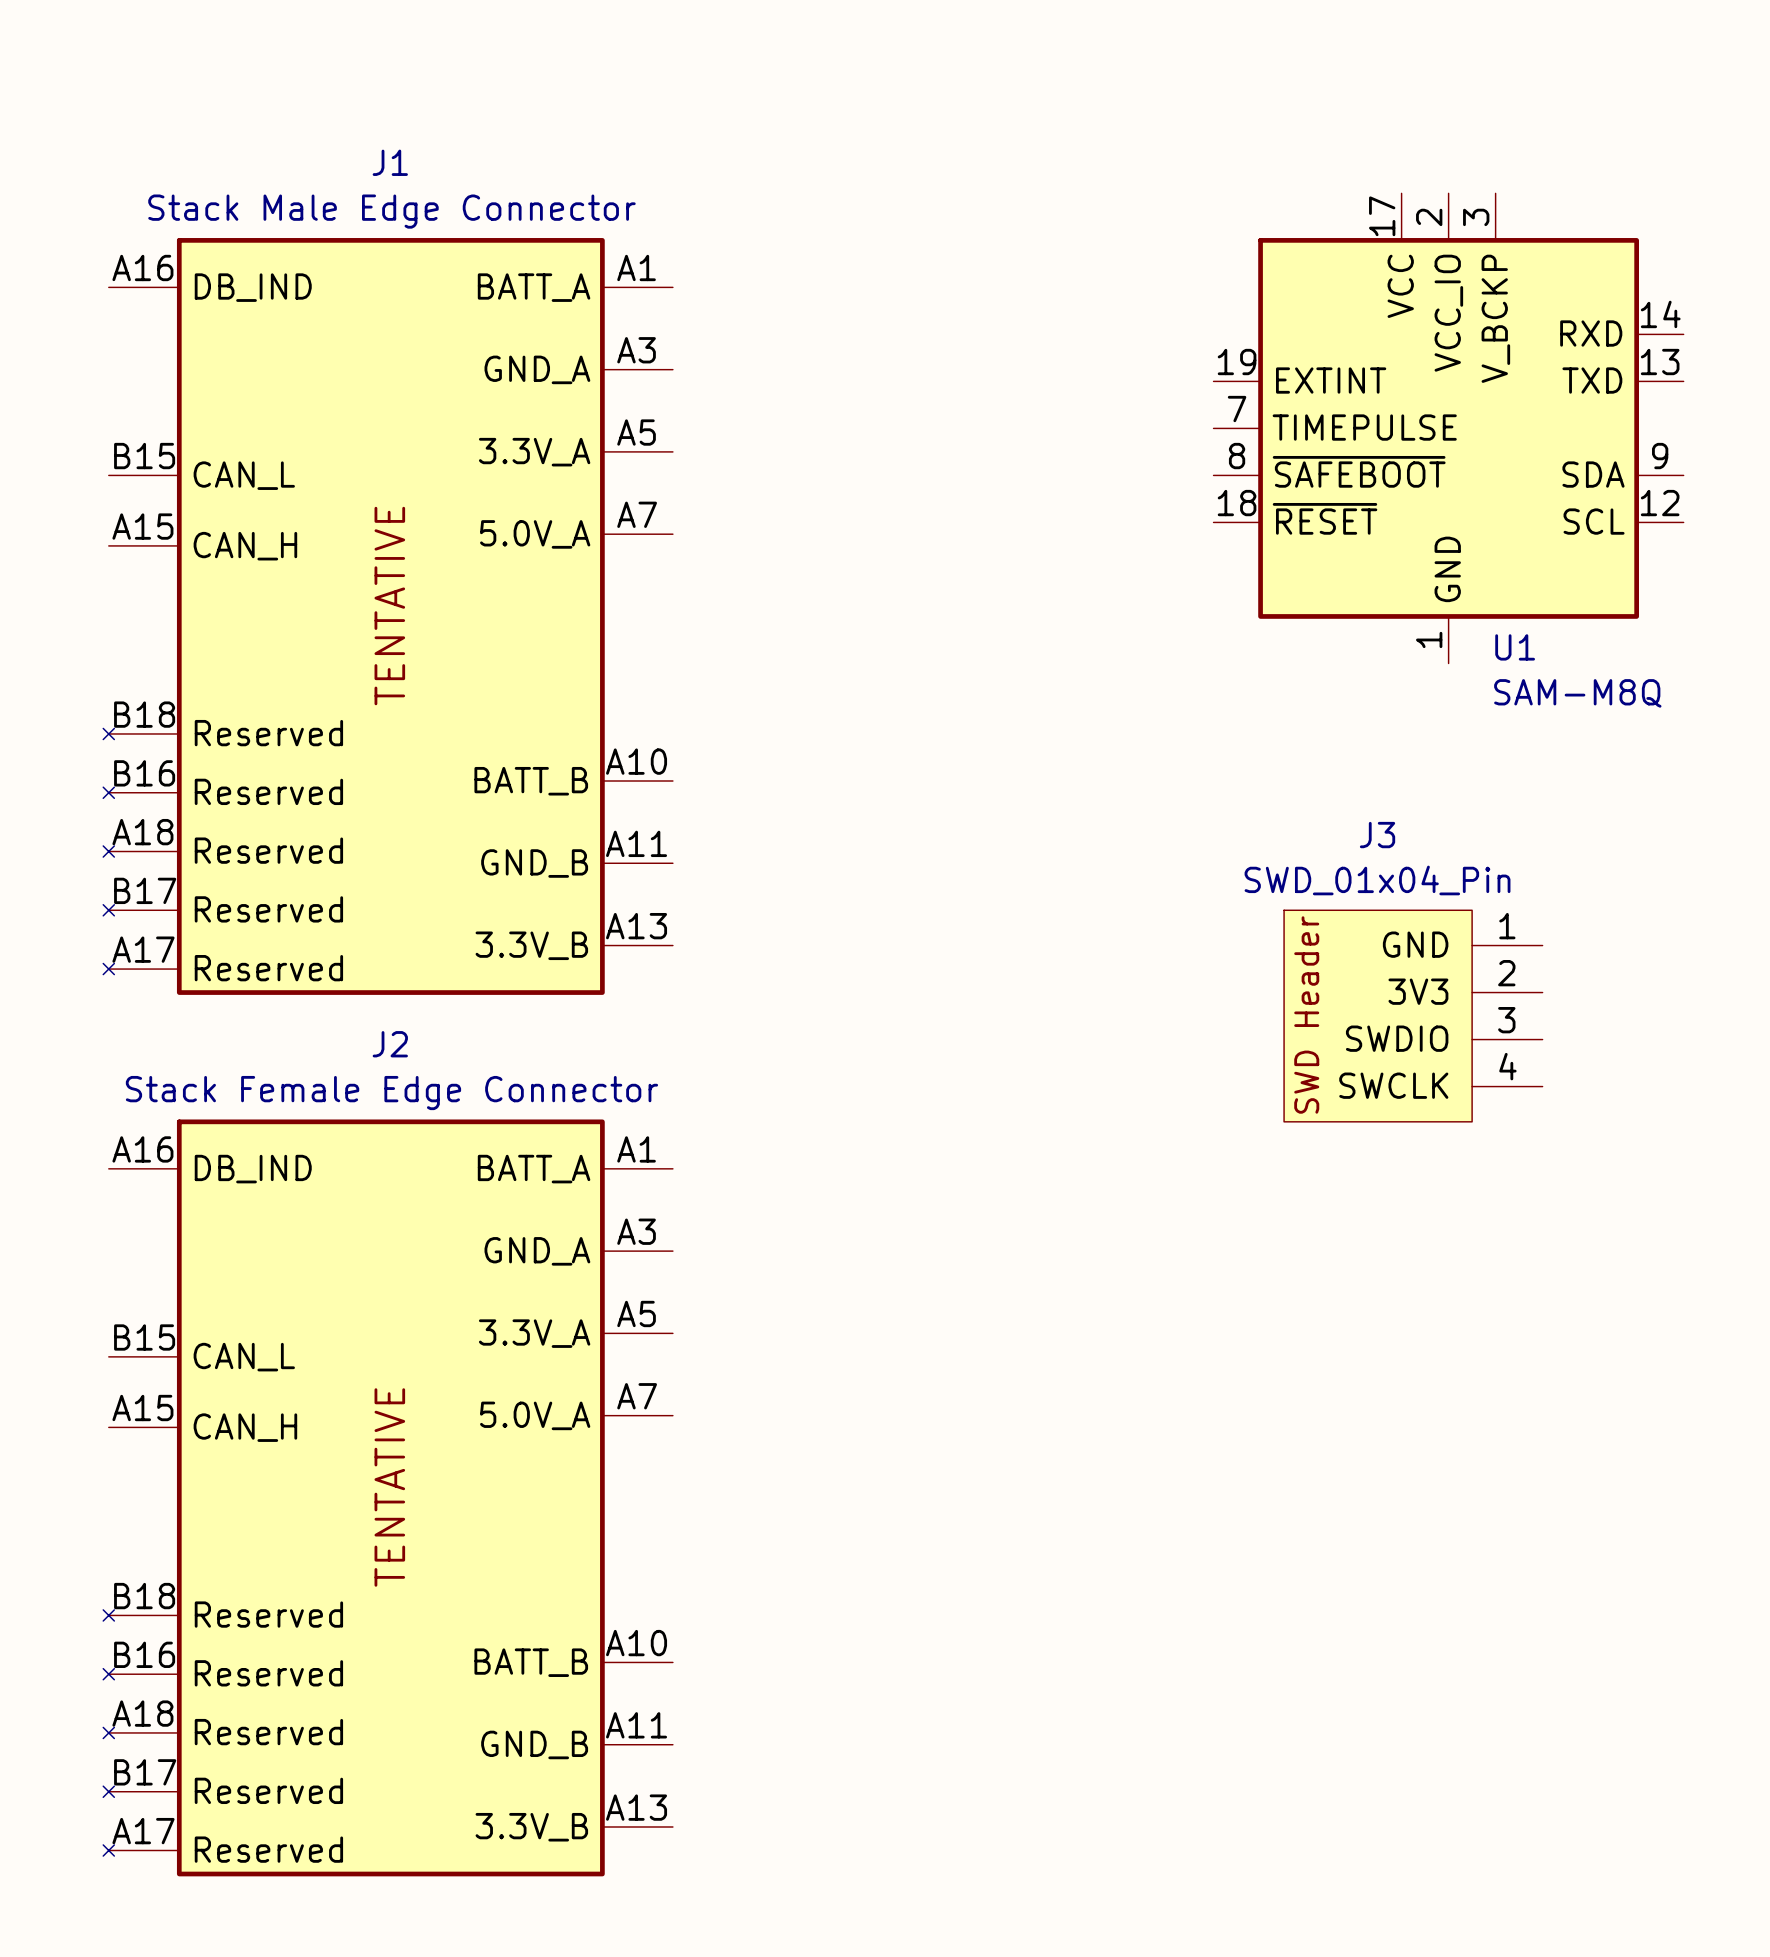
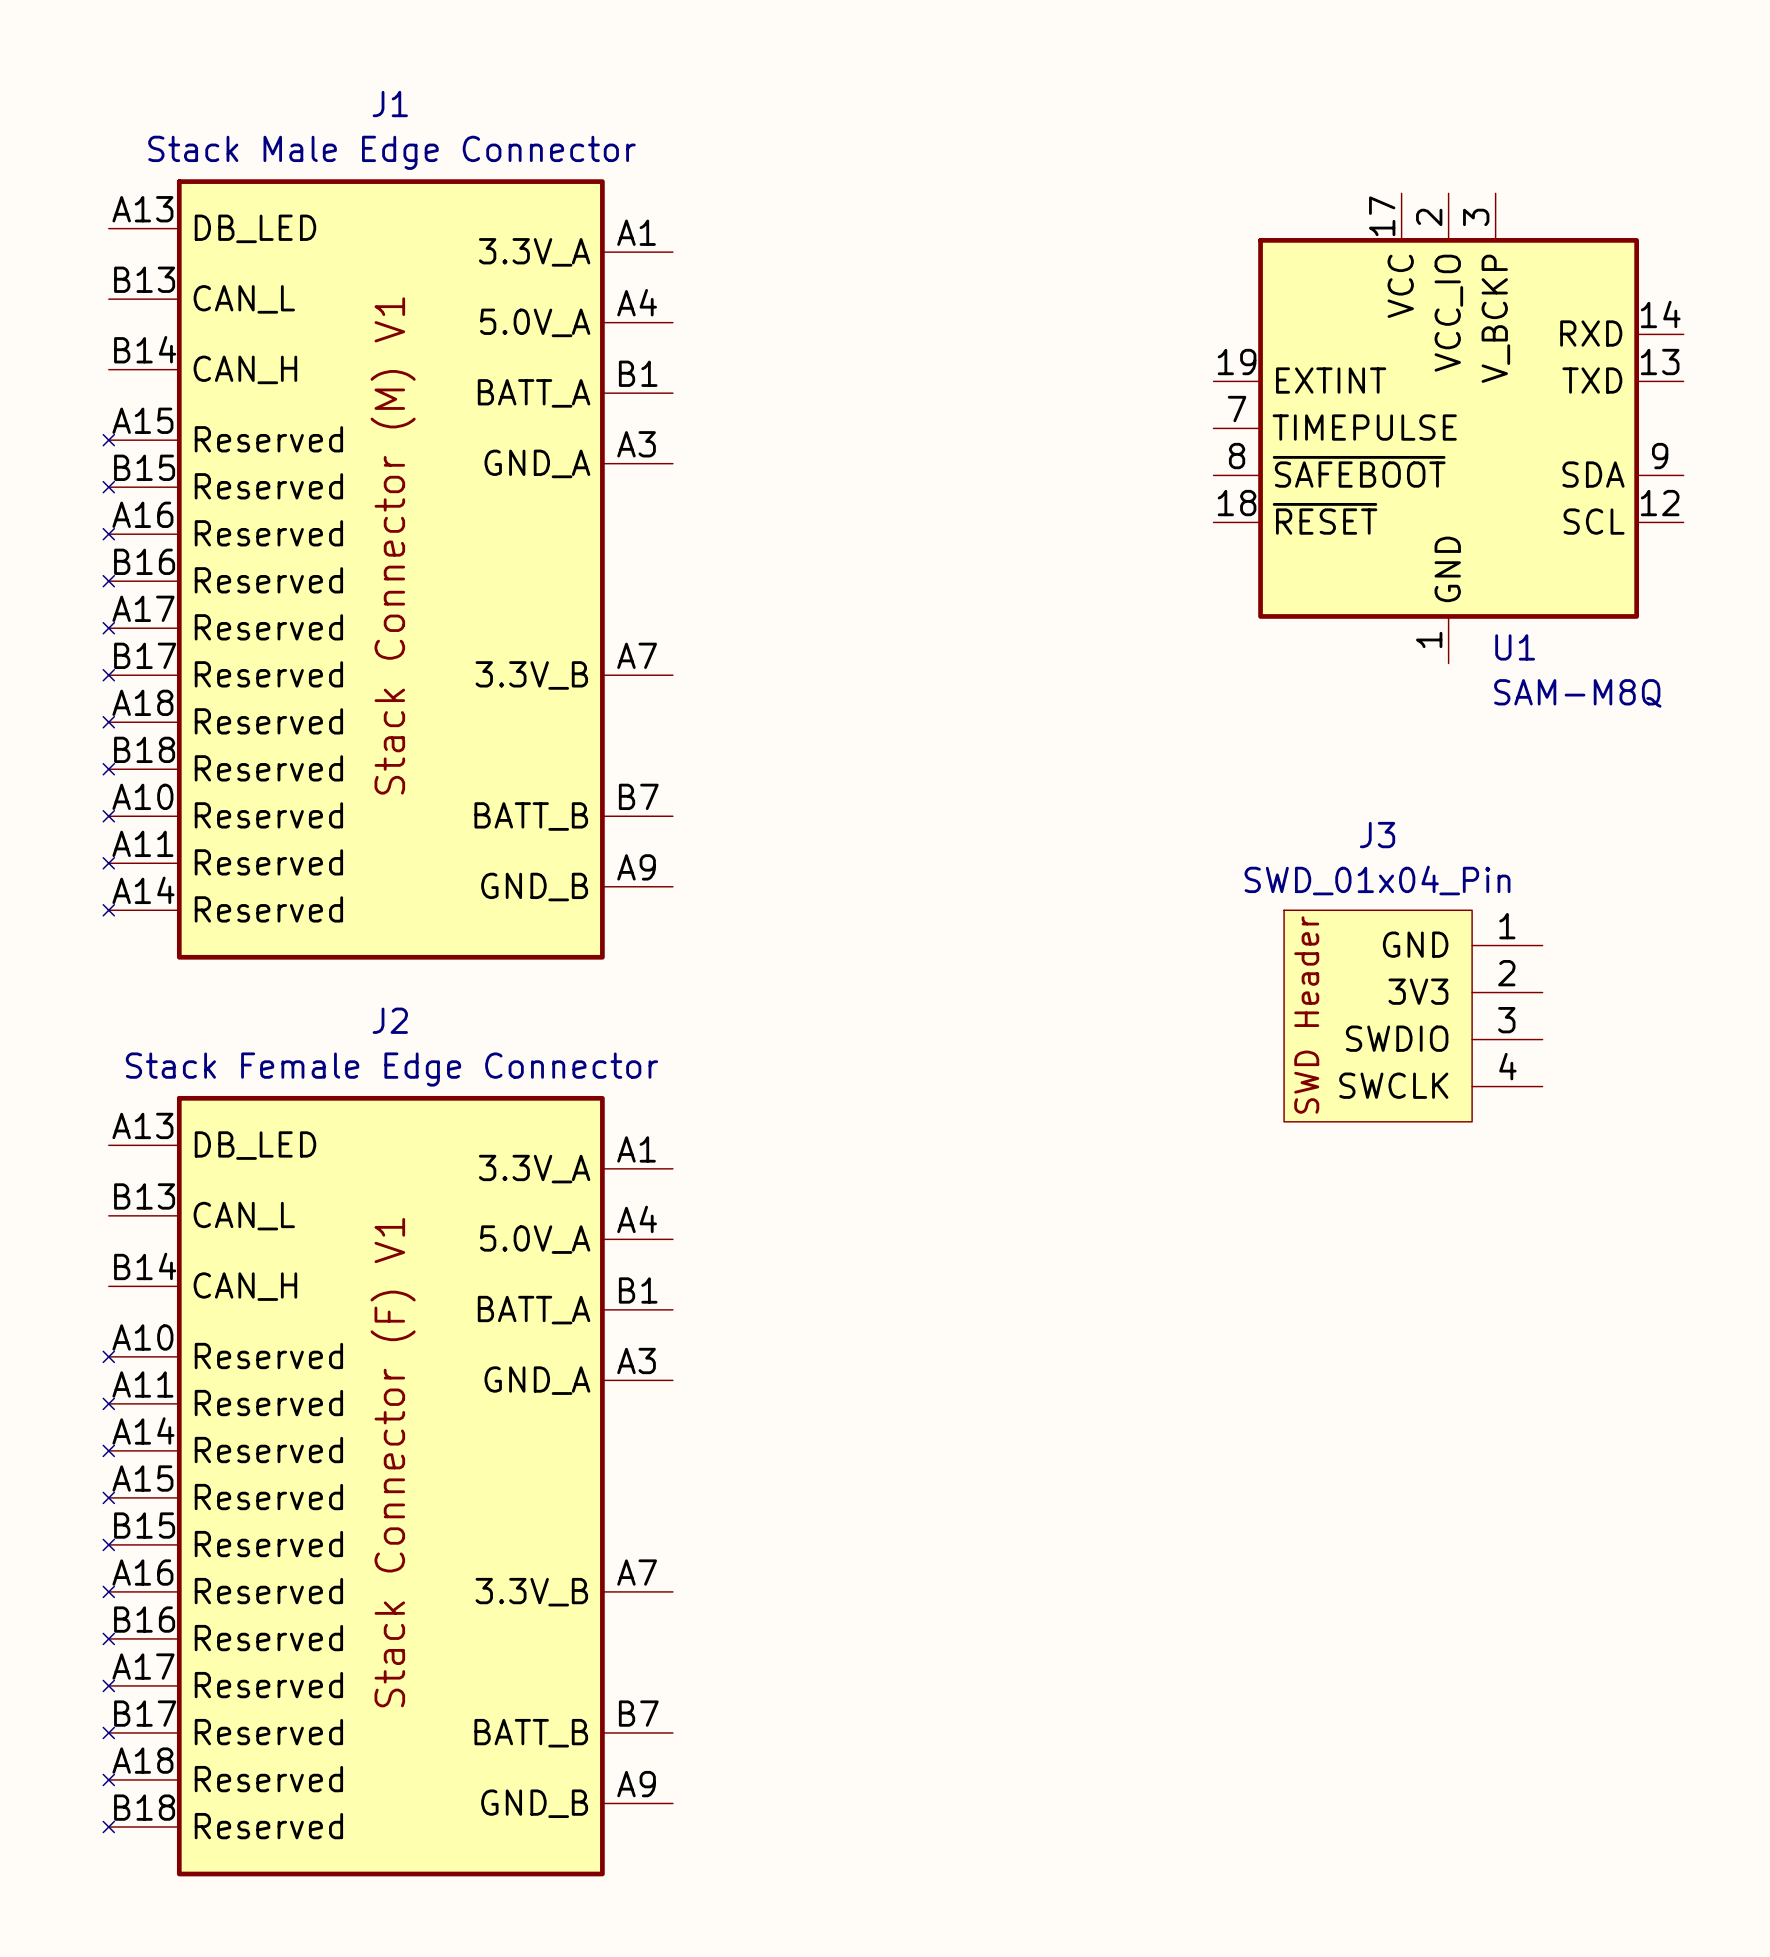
J1 symbol: [103, 238, 673, 995] -> [103, 179, 673, 960]
J2 symbol: [103, 1119, 673, 1877] -> [103, 1095, 673, 1877]

